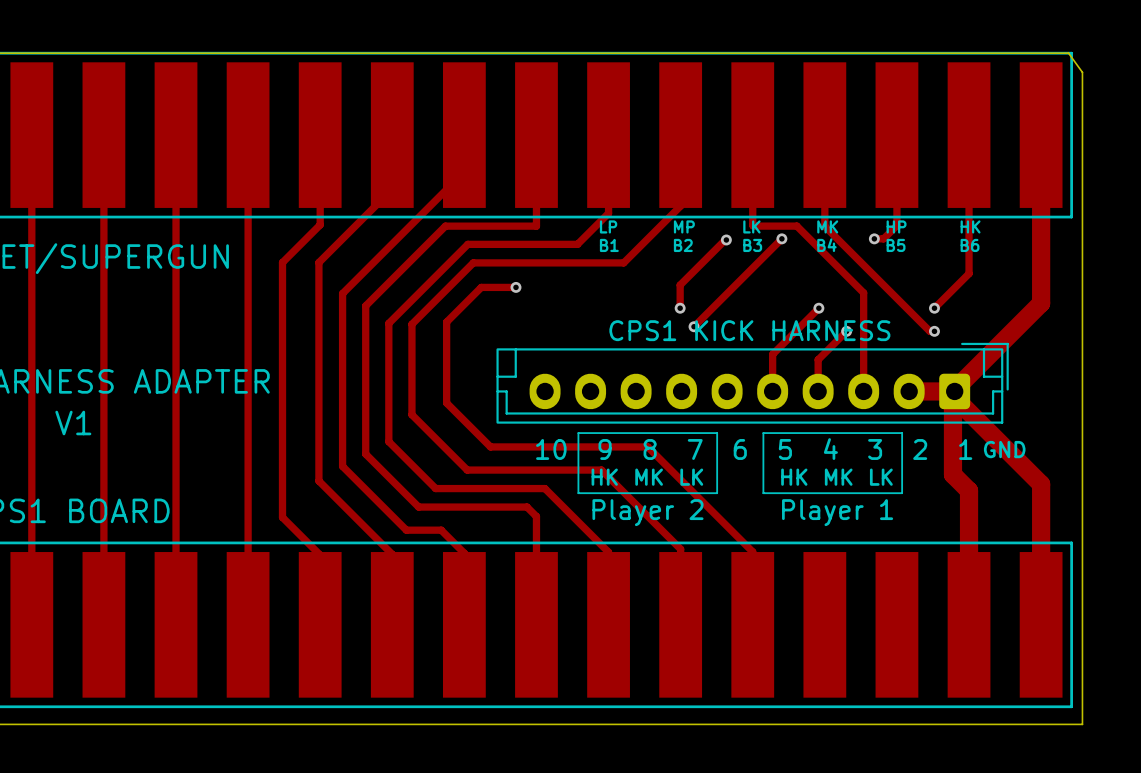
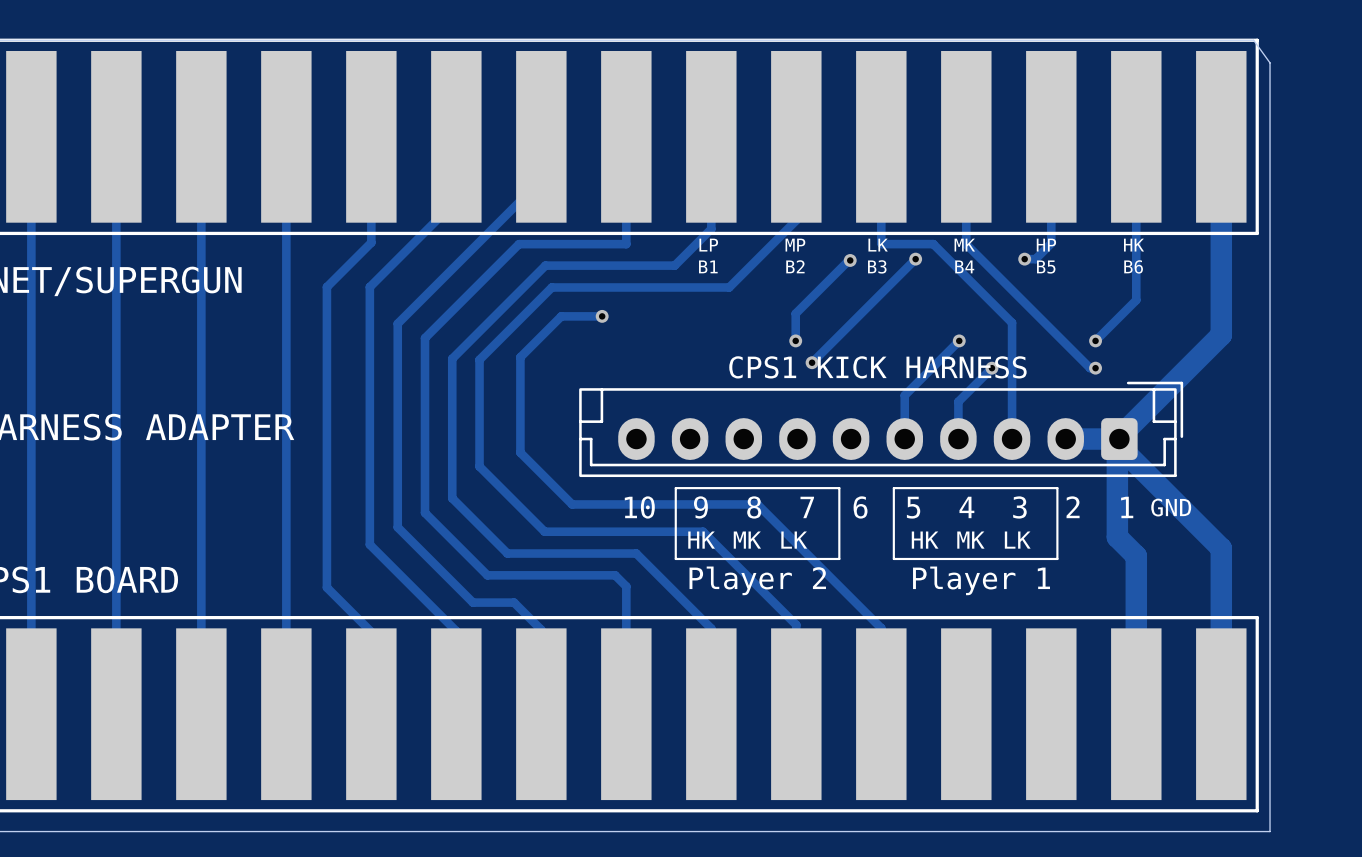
text: V1 (73, 423) -> none

